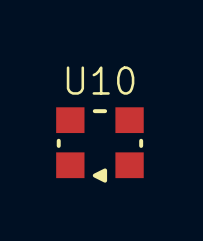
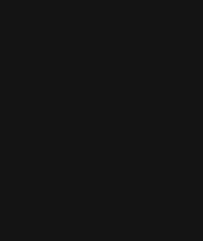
U10: (99, 144) -> none

